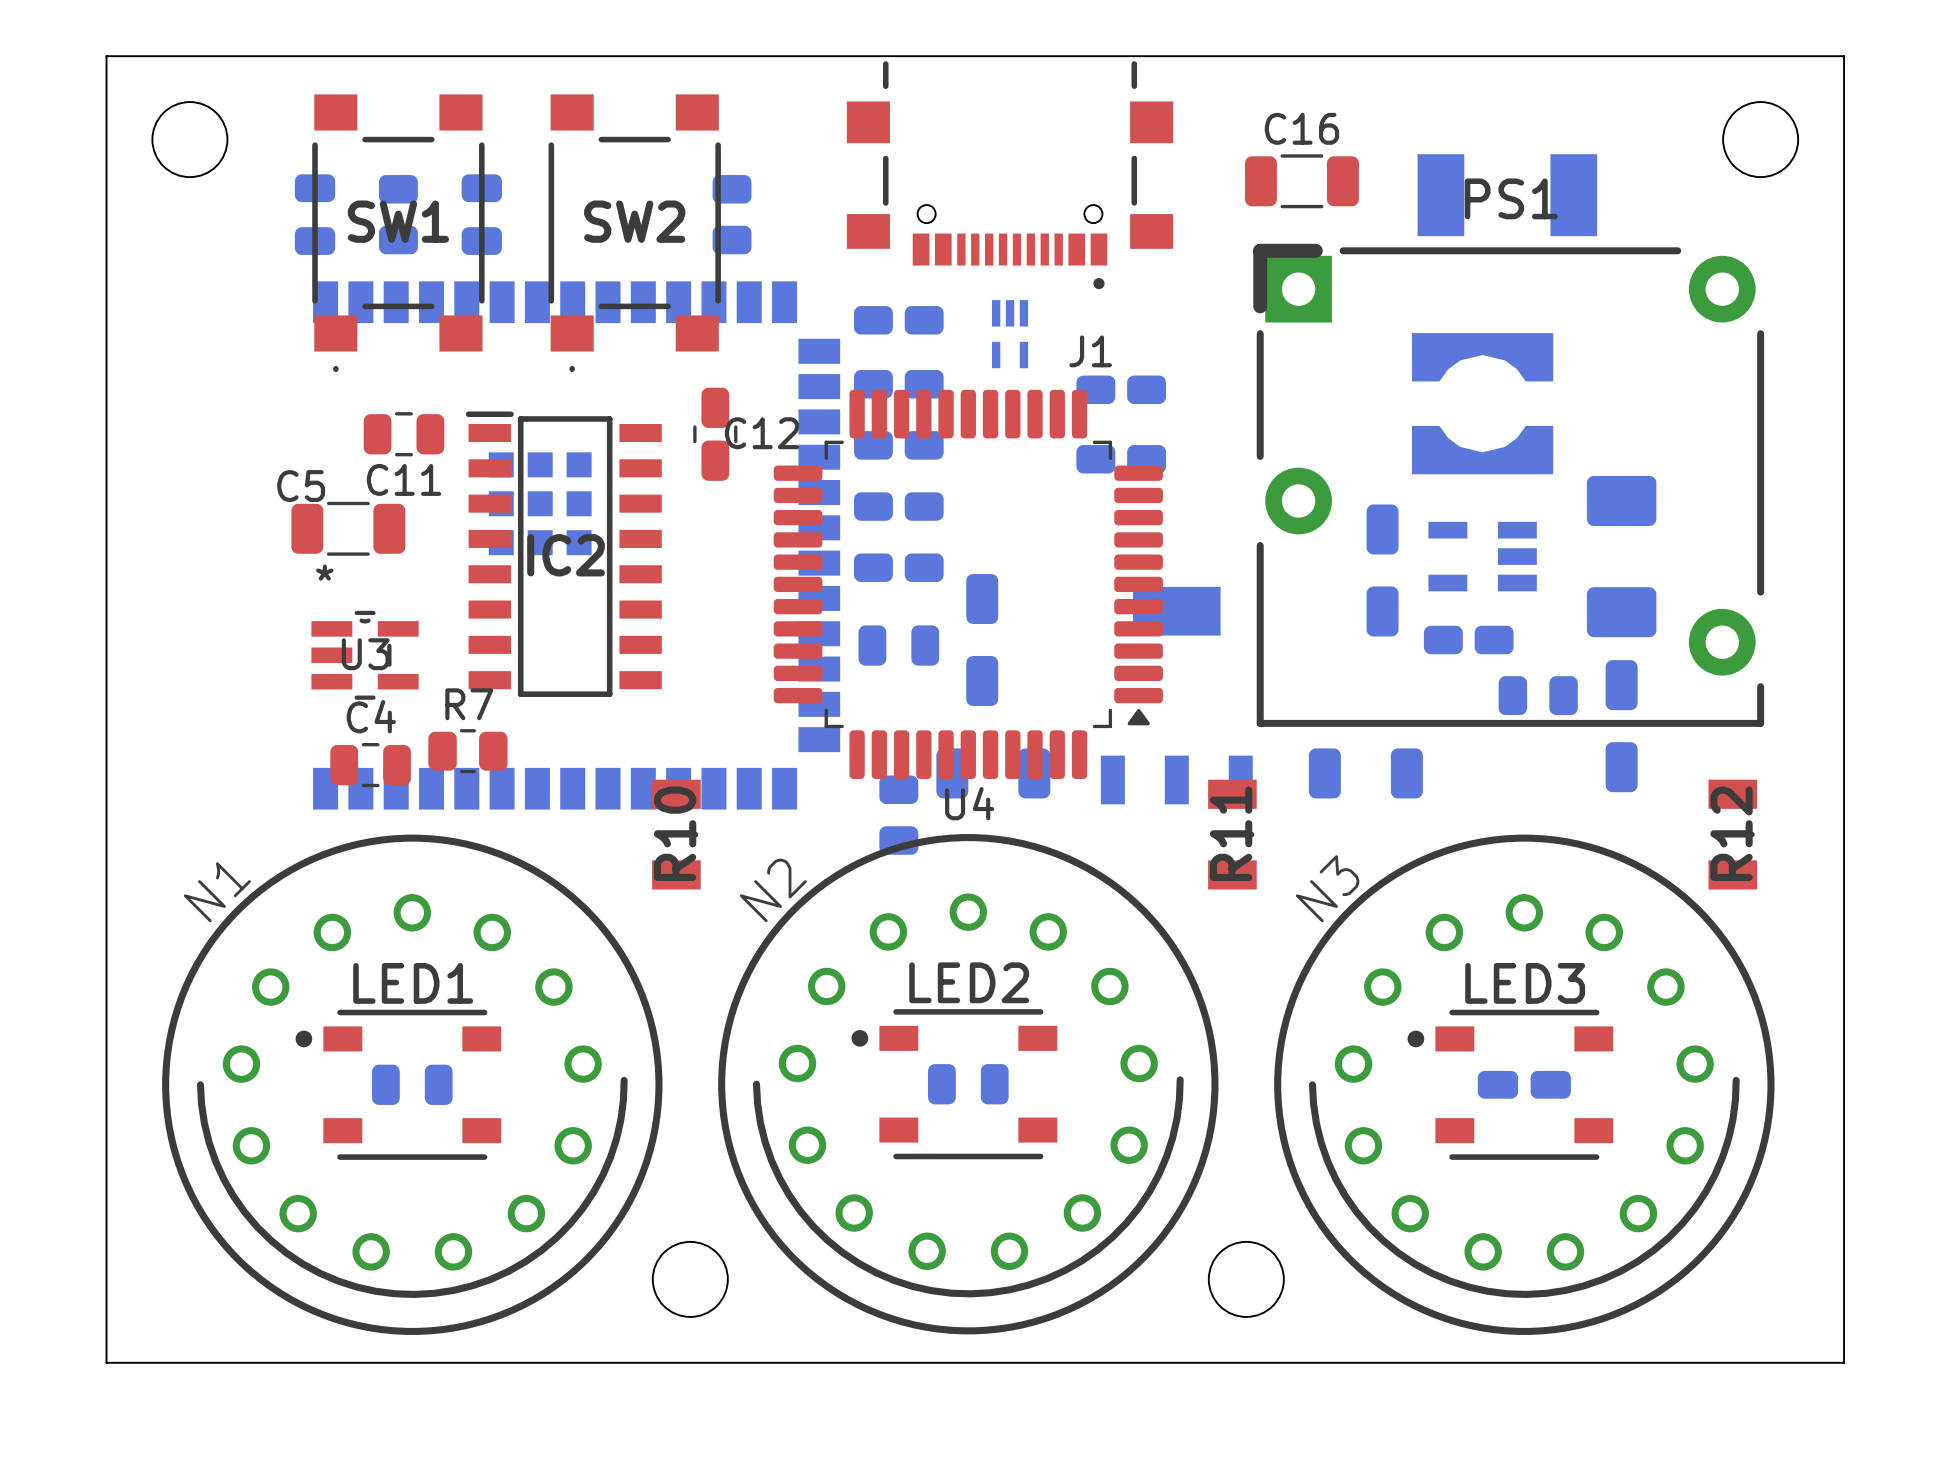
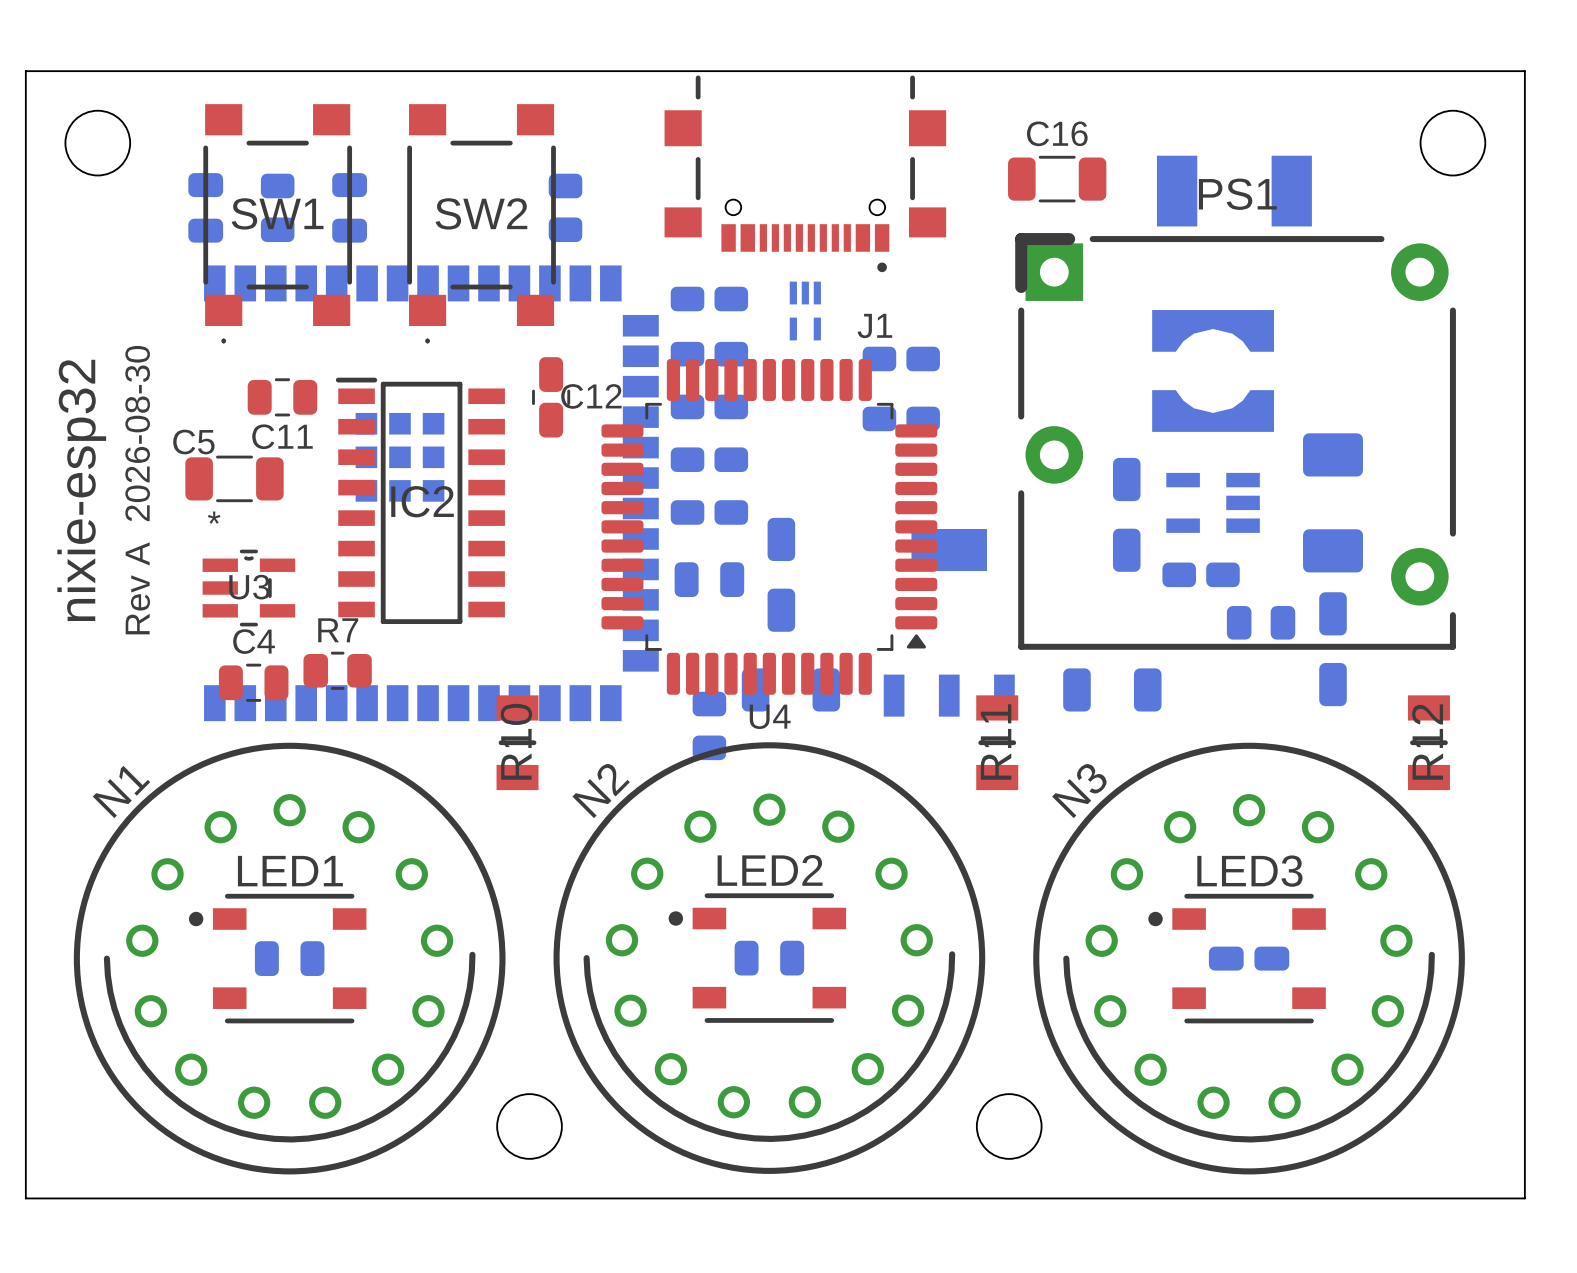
text: none -> nixie-esp32 (81, 490)
text: none -> Rev A 2026-08-30 (137, 490)

